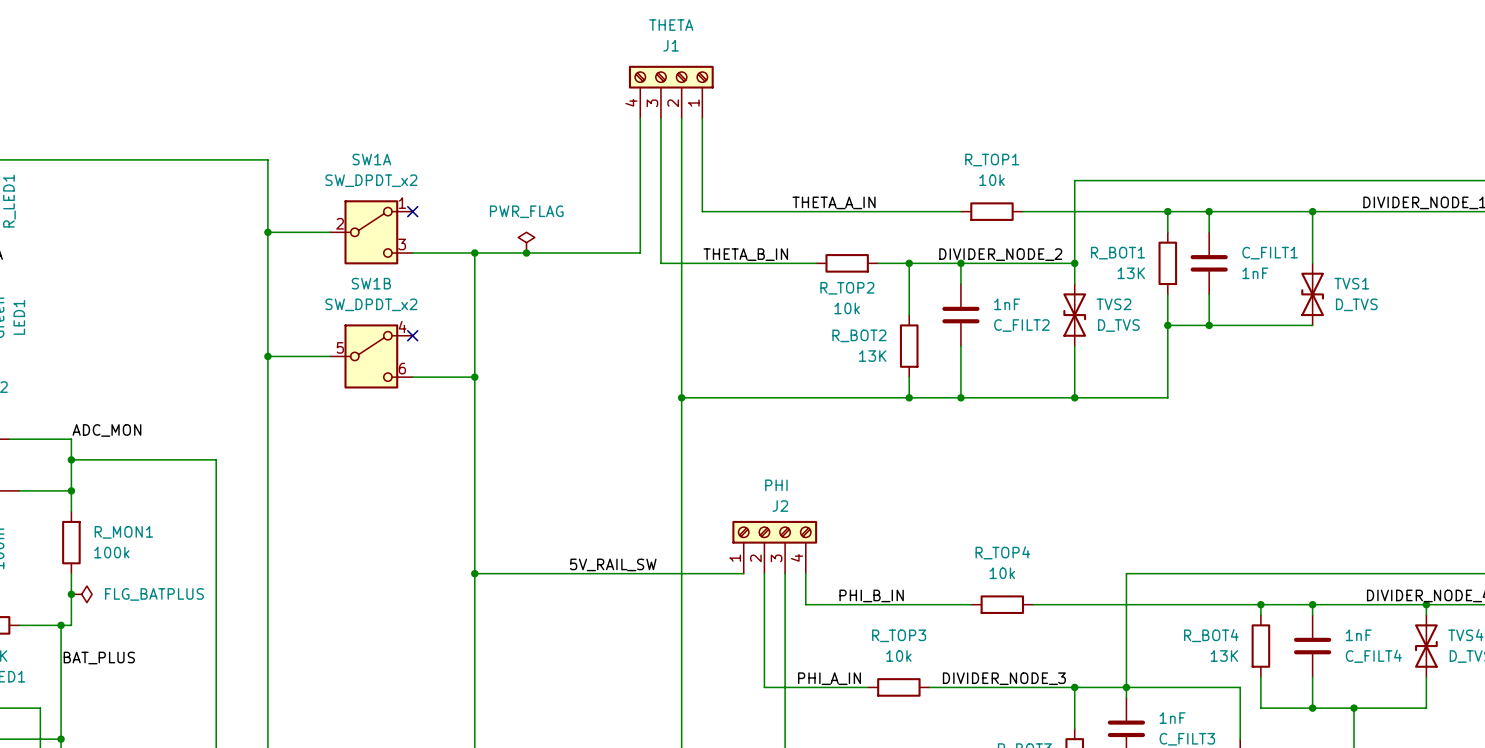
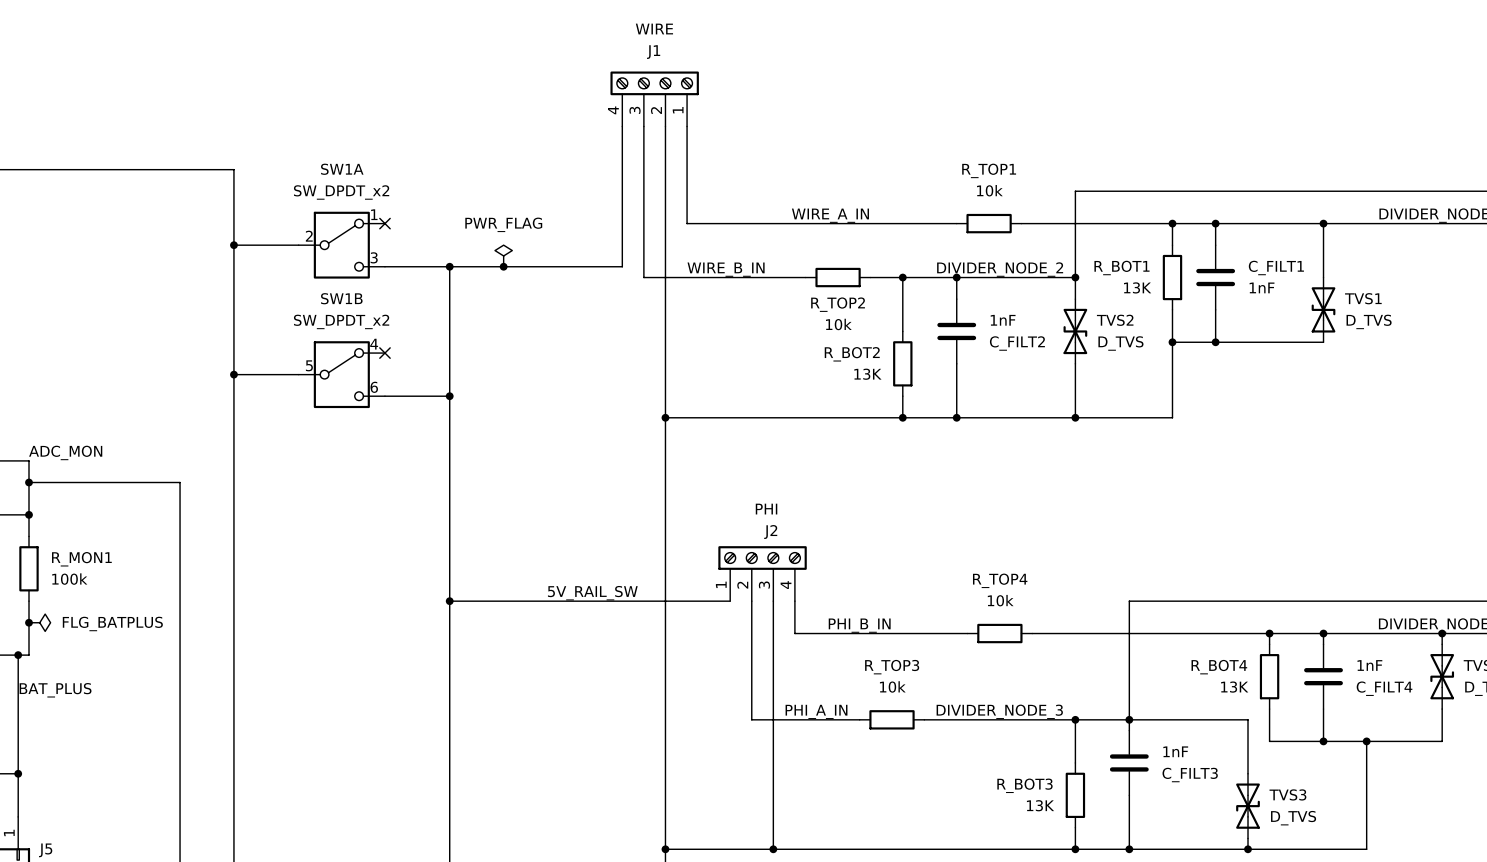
J1 value: THETA (671, 25) -> WIRE (654, 29)
label: THETA_A_IN (834, 202) -> WIRE_A_IN (830, 215)
label: THETA_B_IN (745, 254) -> WIRE_B_IN (726, 269)

